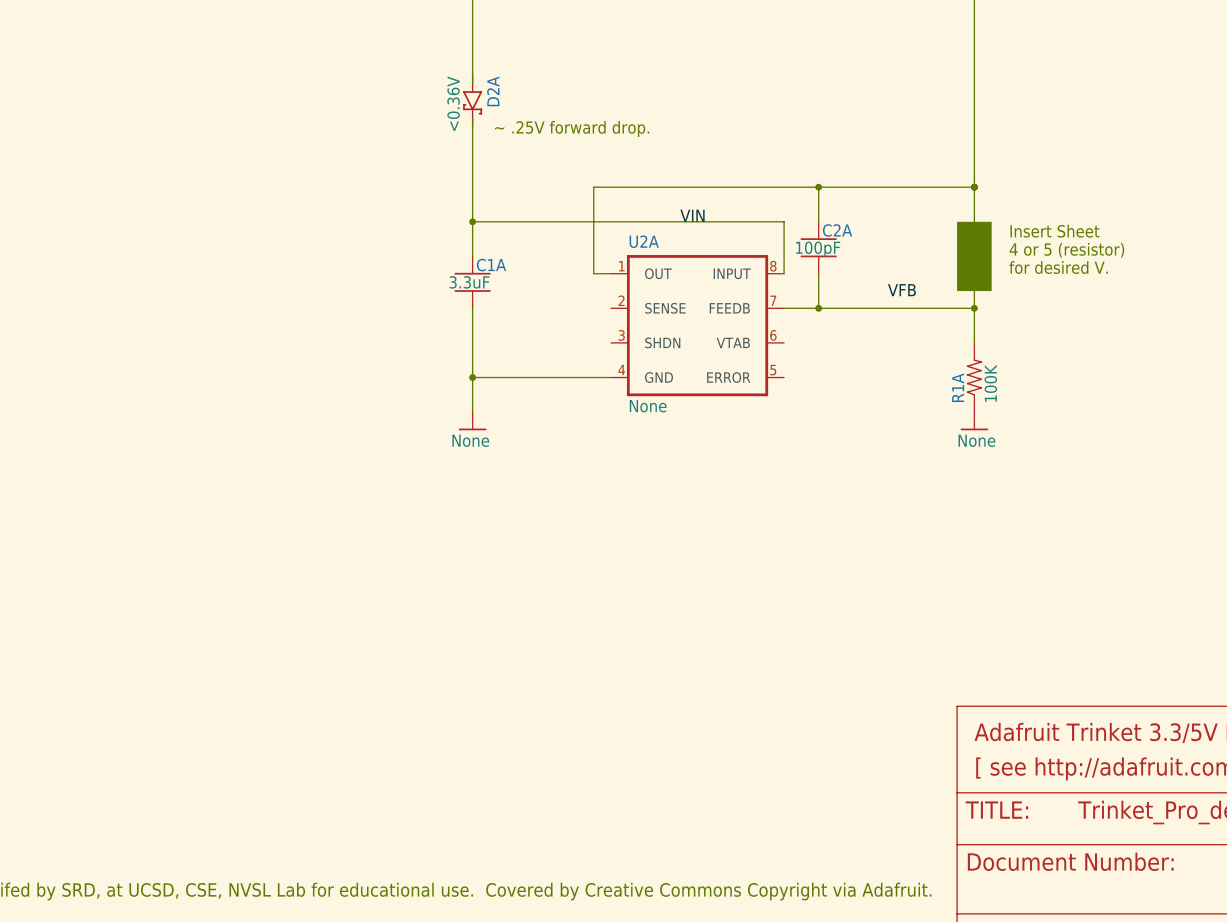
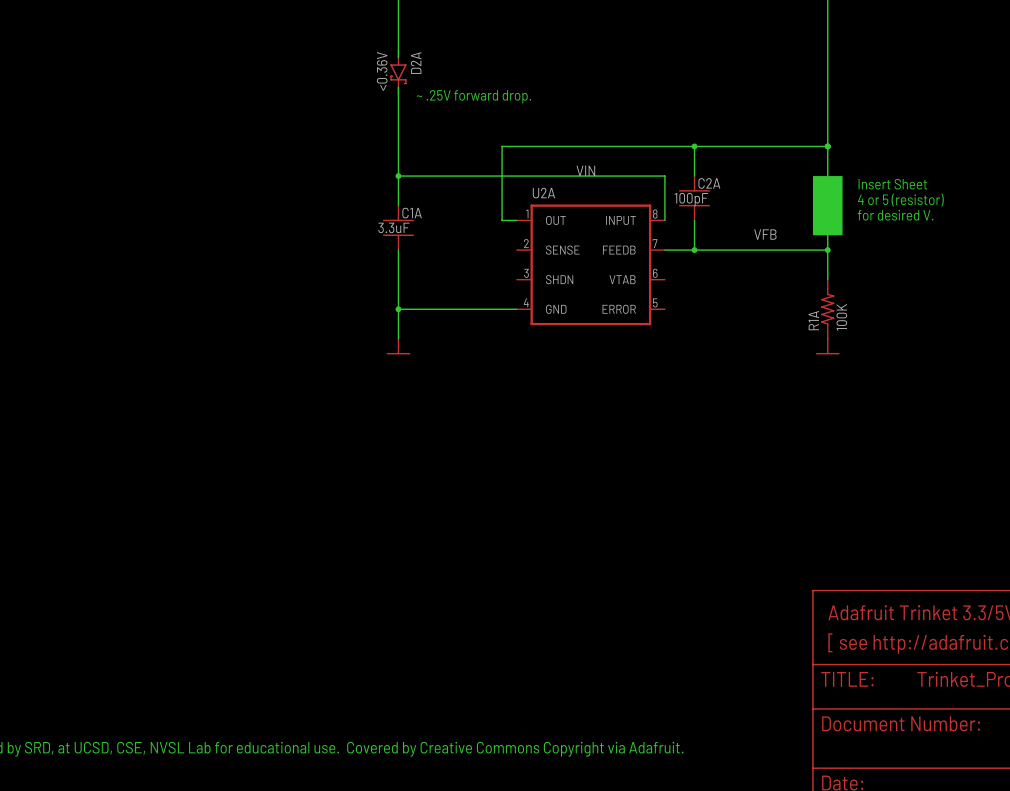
U2A value: None (648, 406) -> none
power symbol text: None (470, 440) -> none
power symbol text: None (976, 440) -> none

